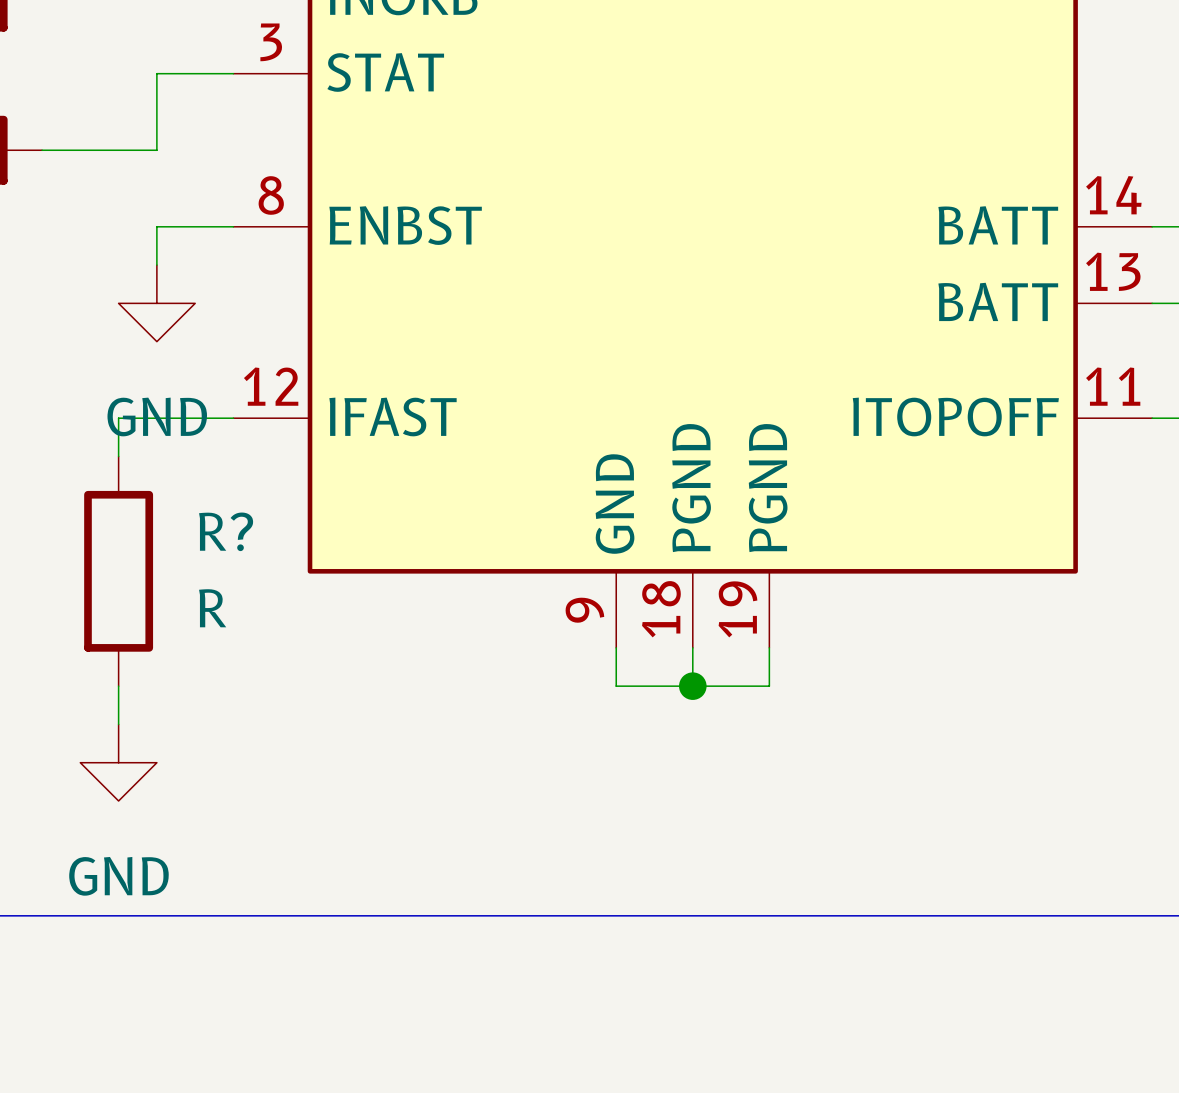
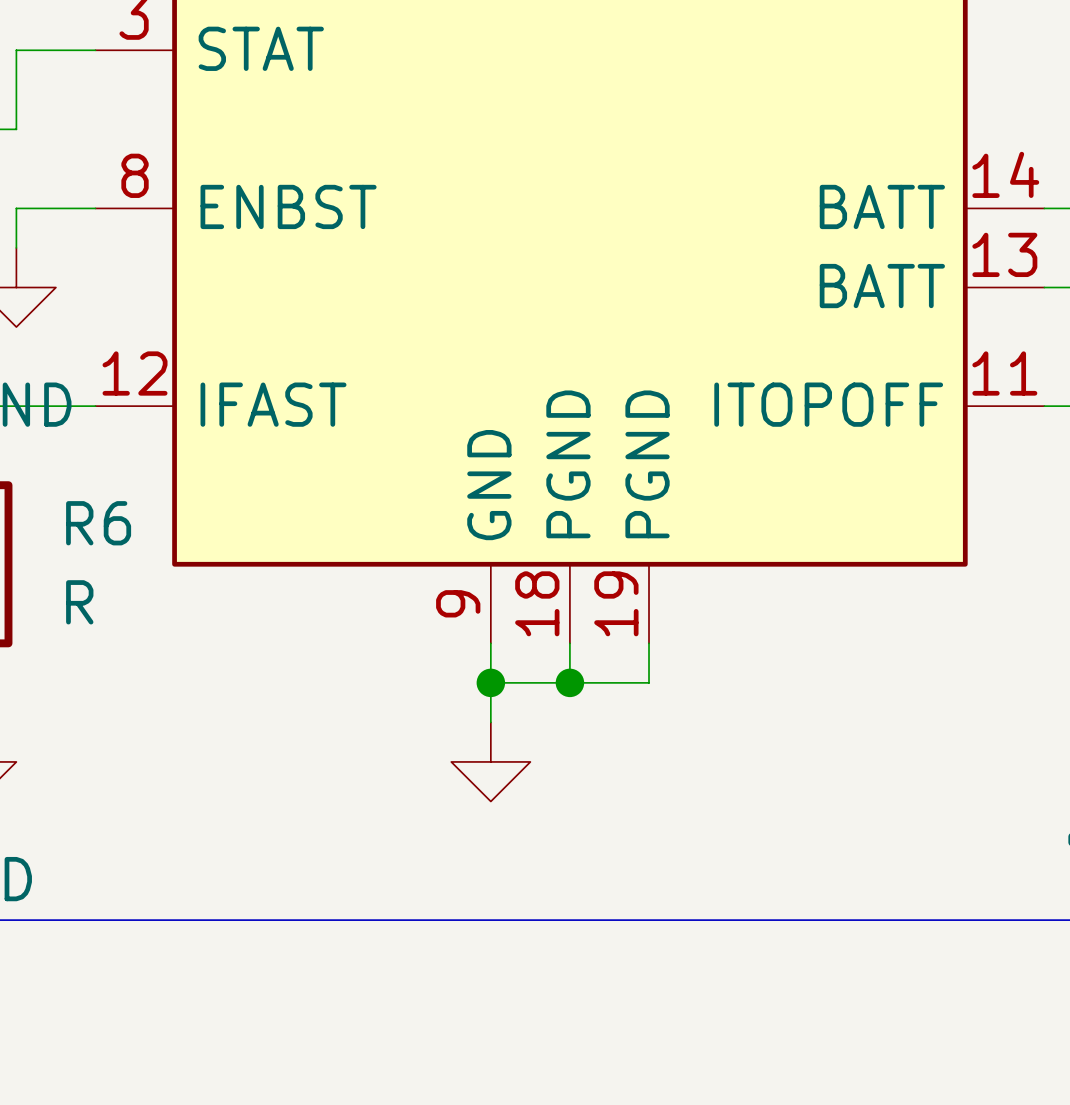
R? name: R? (226, 531) -> R6 (98, 523)
wire: none -> (490, 682) (490, 722)
junction: none -> (490, 682)
power symbol: none -> (490, 761)

